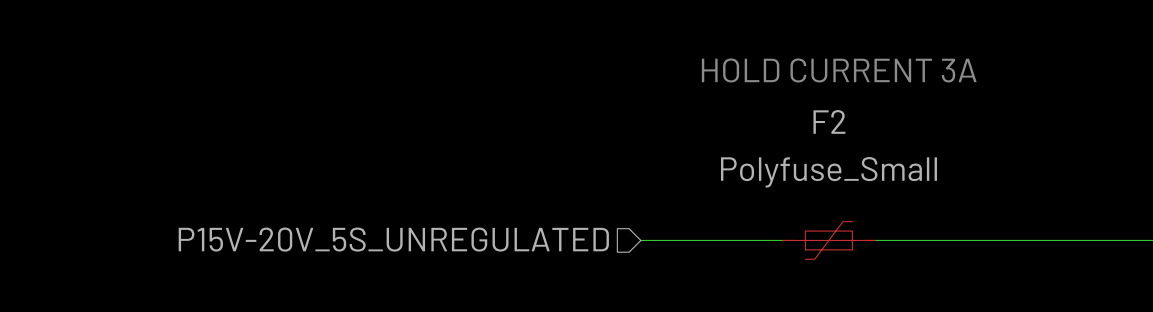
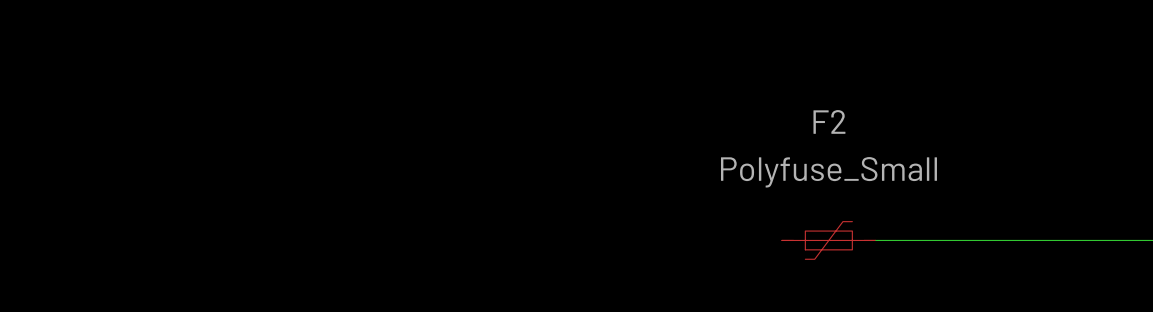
text: HOLD CURRENT 3A (839, 70) -> none
hierarchical label: P15V-20V_5S_UNREGULATED (393, 239) -> none
wire: (640, 240) (781, 240) -> none

